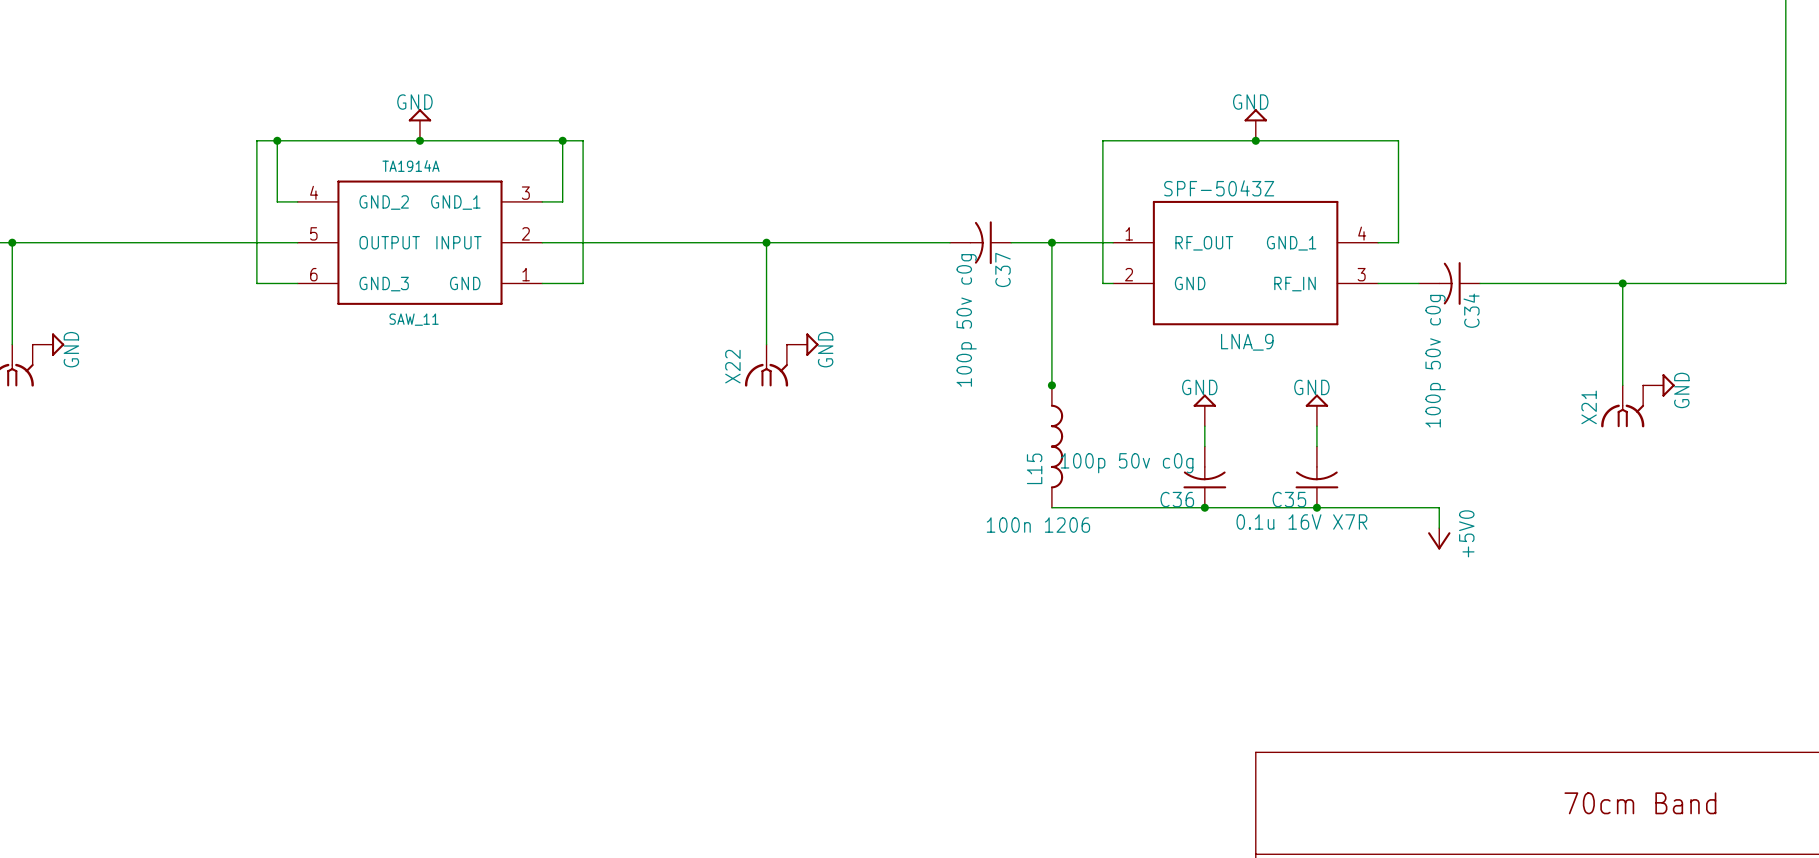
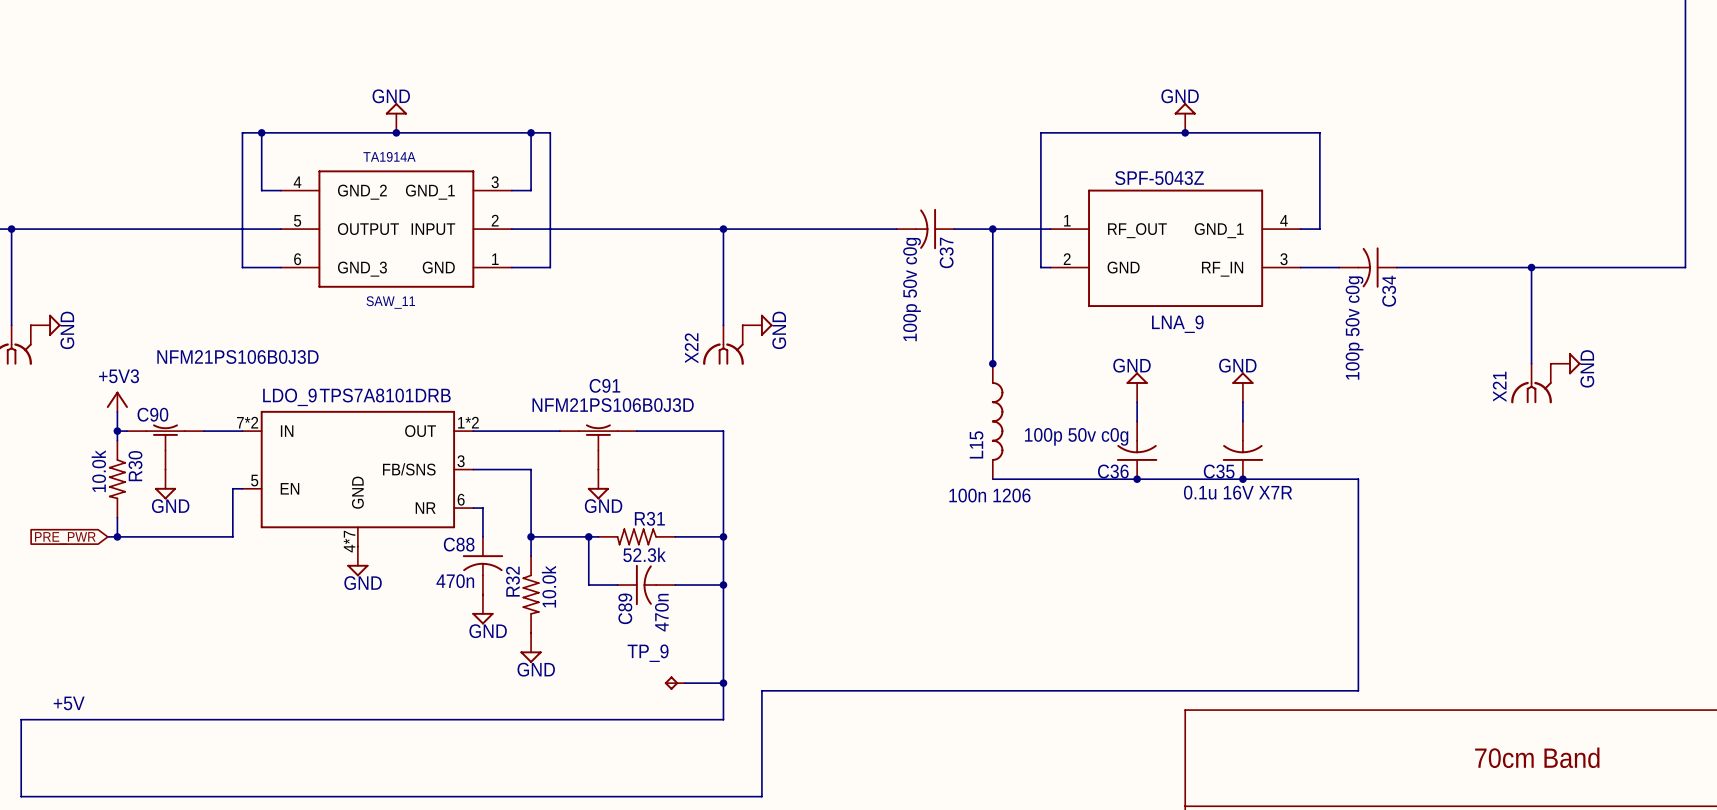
power symbol: none -> +5V3 (117, 401)
wire: none -> (117, 411) (117, 440)
wire: none -> (117, 431) (127, 431)
junction: none -> (117, 431)
wire: none -> (203, 431) (242, 431)
wire: none -> (473, 431) (559, 431)
wire: none -> (636, 431) (723, 431) (723, 719) (21, 719) (21, 796) (761, 796) (761, 690) (1358, 690) (1358, 498)
C90: none -> NFM21PS106B0J3D (165, 446)
C91: none -> NFM21PS106B0J3D (598, 446)
wire: none -> (473, 469) (531, 469) (531, 556)
R30: none -> 10.0k (117, 479)
LDO_9: none -> TPS7A8101DRB (357, 478)
power symbol: none -> GND (165, 484)
power symbol: none -> GND (598, 484)
wire: none -> (242, 488) (232, 488) (232, 536) (107, 536)
wire: none -> (473, 508) (482, 508) (482, 536)
power symbol: +5V0 (1439, 538) -> none
wire: none -> (117, 517) (117, 536)
junction: none -> (117, 536)
wire: none -> (531, 536) (598, 536)
junction: none -> (531, 536)
wire: none -> (588, 536) (588, 585) (617, 585)
junction: none -> (588, 536)
R31: none -> 52.3k (636, 536)
wire: none -> (675, 536) (723, 536)
junction: none -> (723, 536)
global label: none -> PRE_PWR (65, 538)
power symbol: none -> GND (357, 561)
C88: none -> 470n (482, 565)
C89: none -> 470n (646, 585)
wire: none -> (675, 585) (723, 585)
junction: none -> (723, 585)
R32: none -> 10.0k (531, 594)
power symbol: none -> GND (482, 609)
power symbol: none -> GND (531, 648)
TP_9: none -> (674, 683)
wire: none -> (684, 683) (723, 683)
junction: none -> (723, 683)
text: none -> +5V (69, 703)

